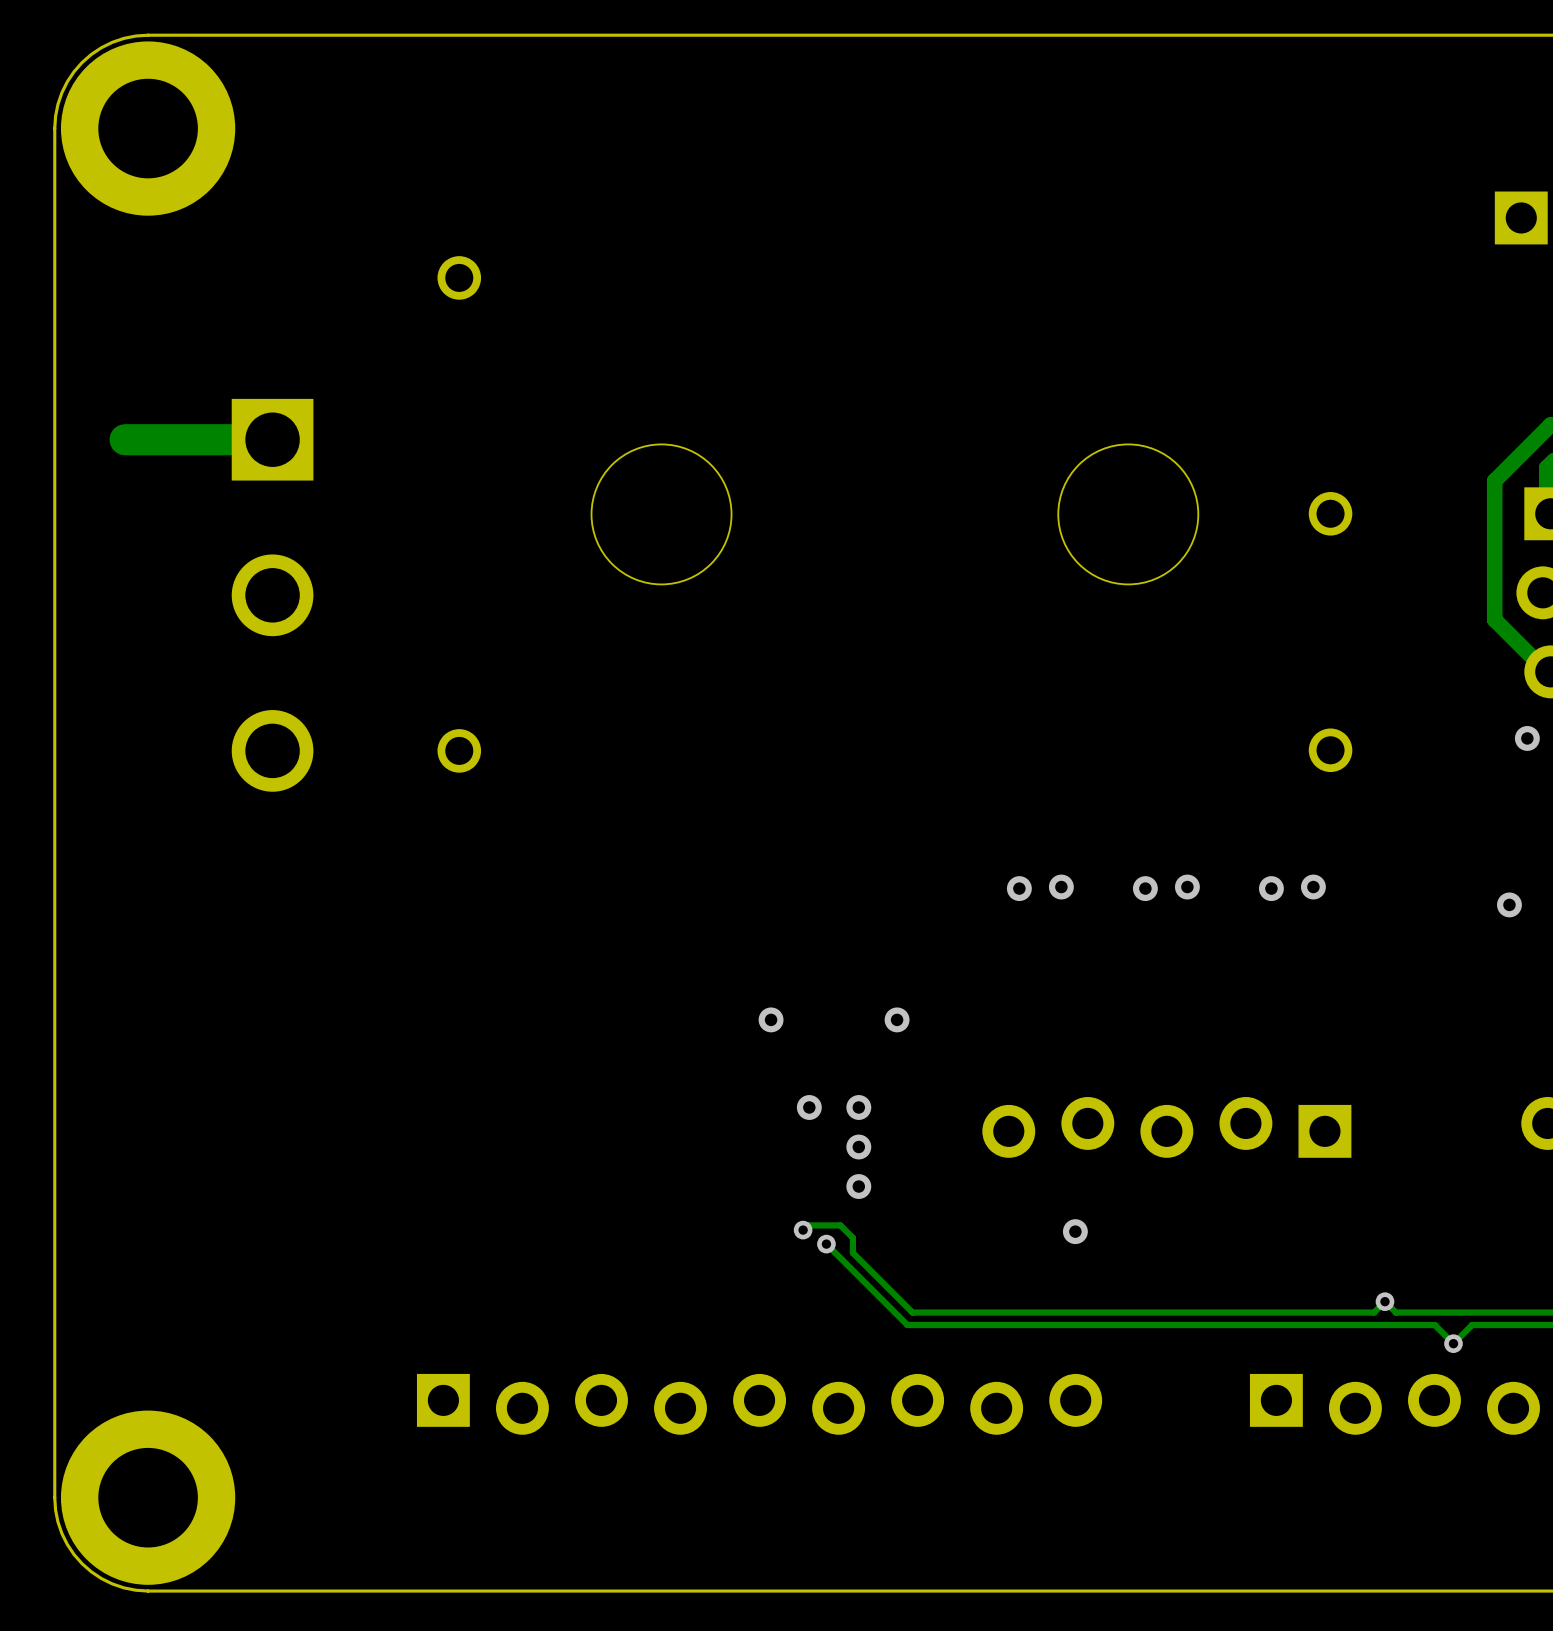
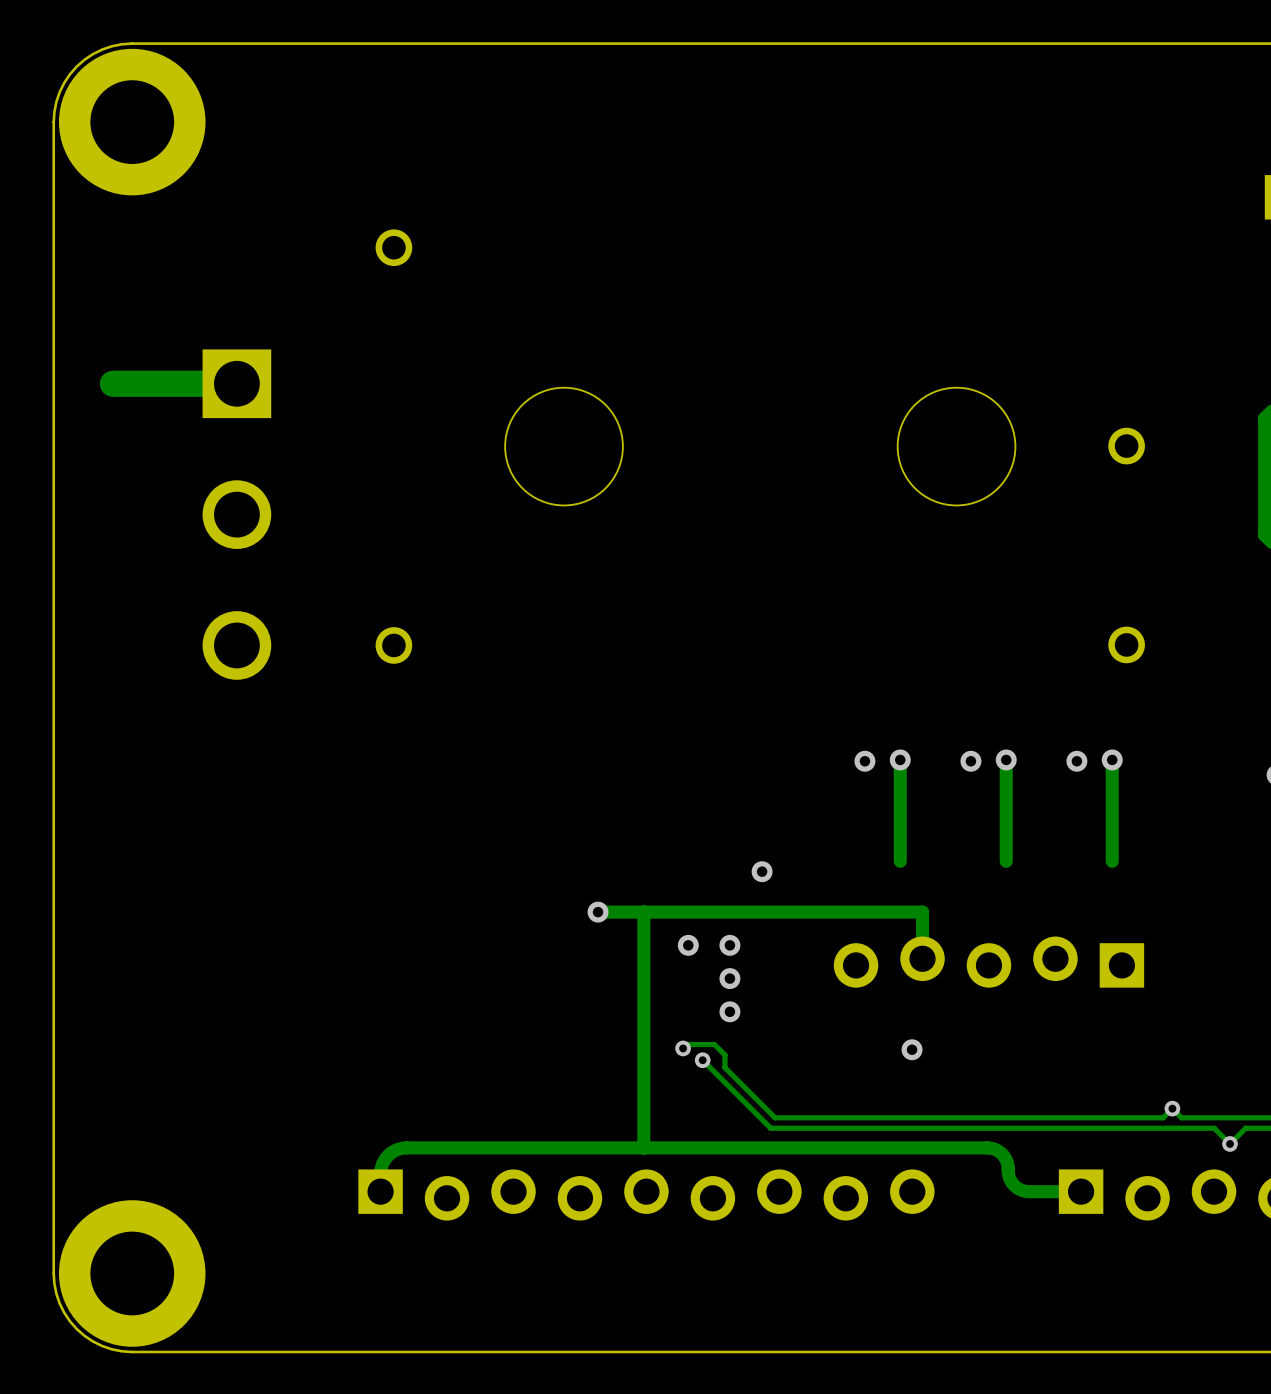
track: none -> (900, 759) (900, 861)
track: none -> (1006, 759) (1006, 861)
track: none -> (1112, 759) (1112, 861)
via position: (771, 1019) -> (598, 912)
track: none -> (598, 912) (922, 912) (922, 958)
track: none -> (643, 912) (643, 1147)
track: none -> (1081, 1191) (1021, 1190) (1011, 1181) (1003, 1156) (997, 1150) (987, 1147) (403, 1148) (390, 1153) (383, 1162) (380, 1171) (380, 1191)

